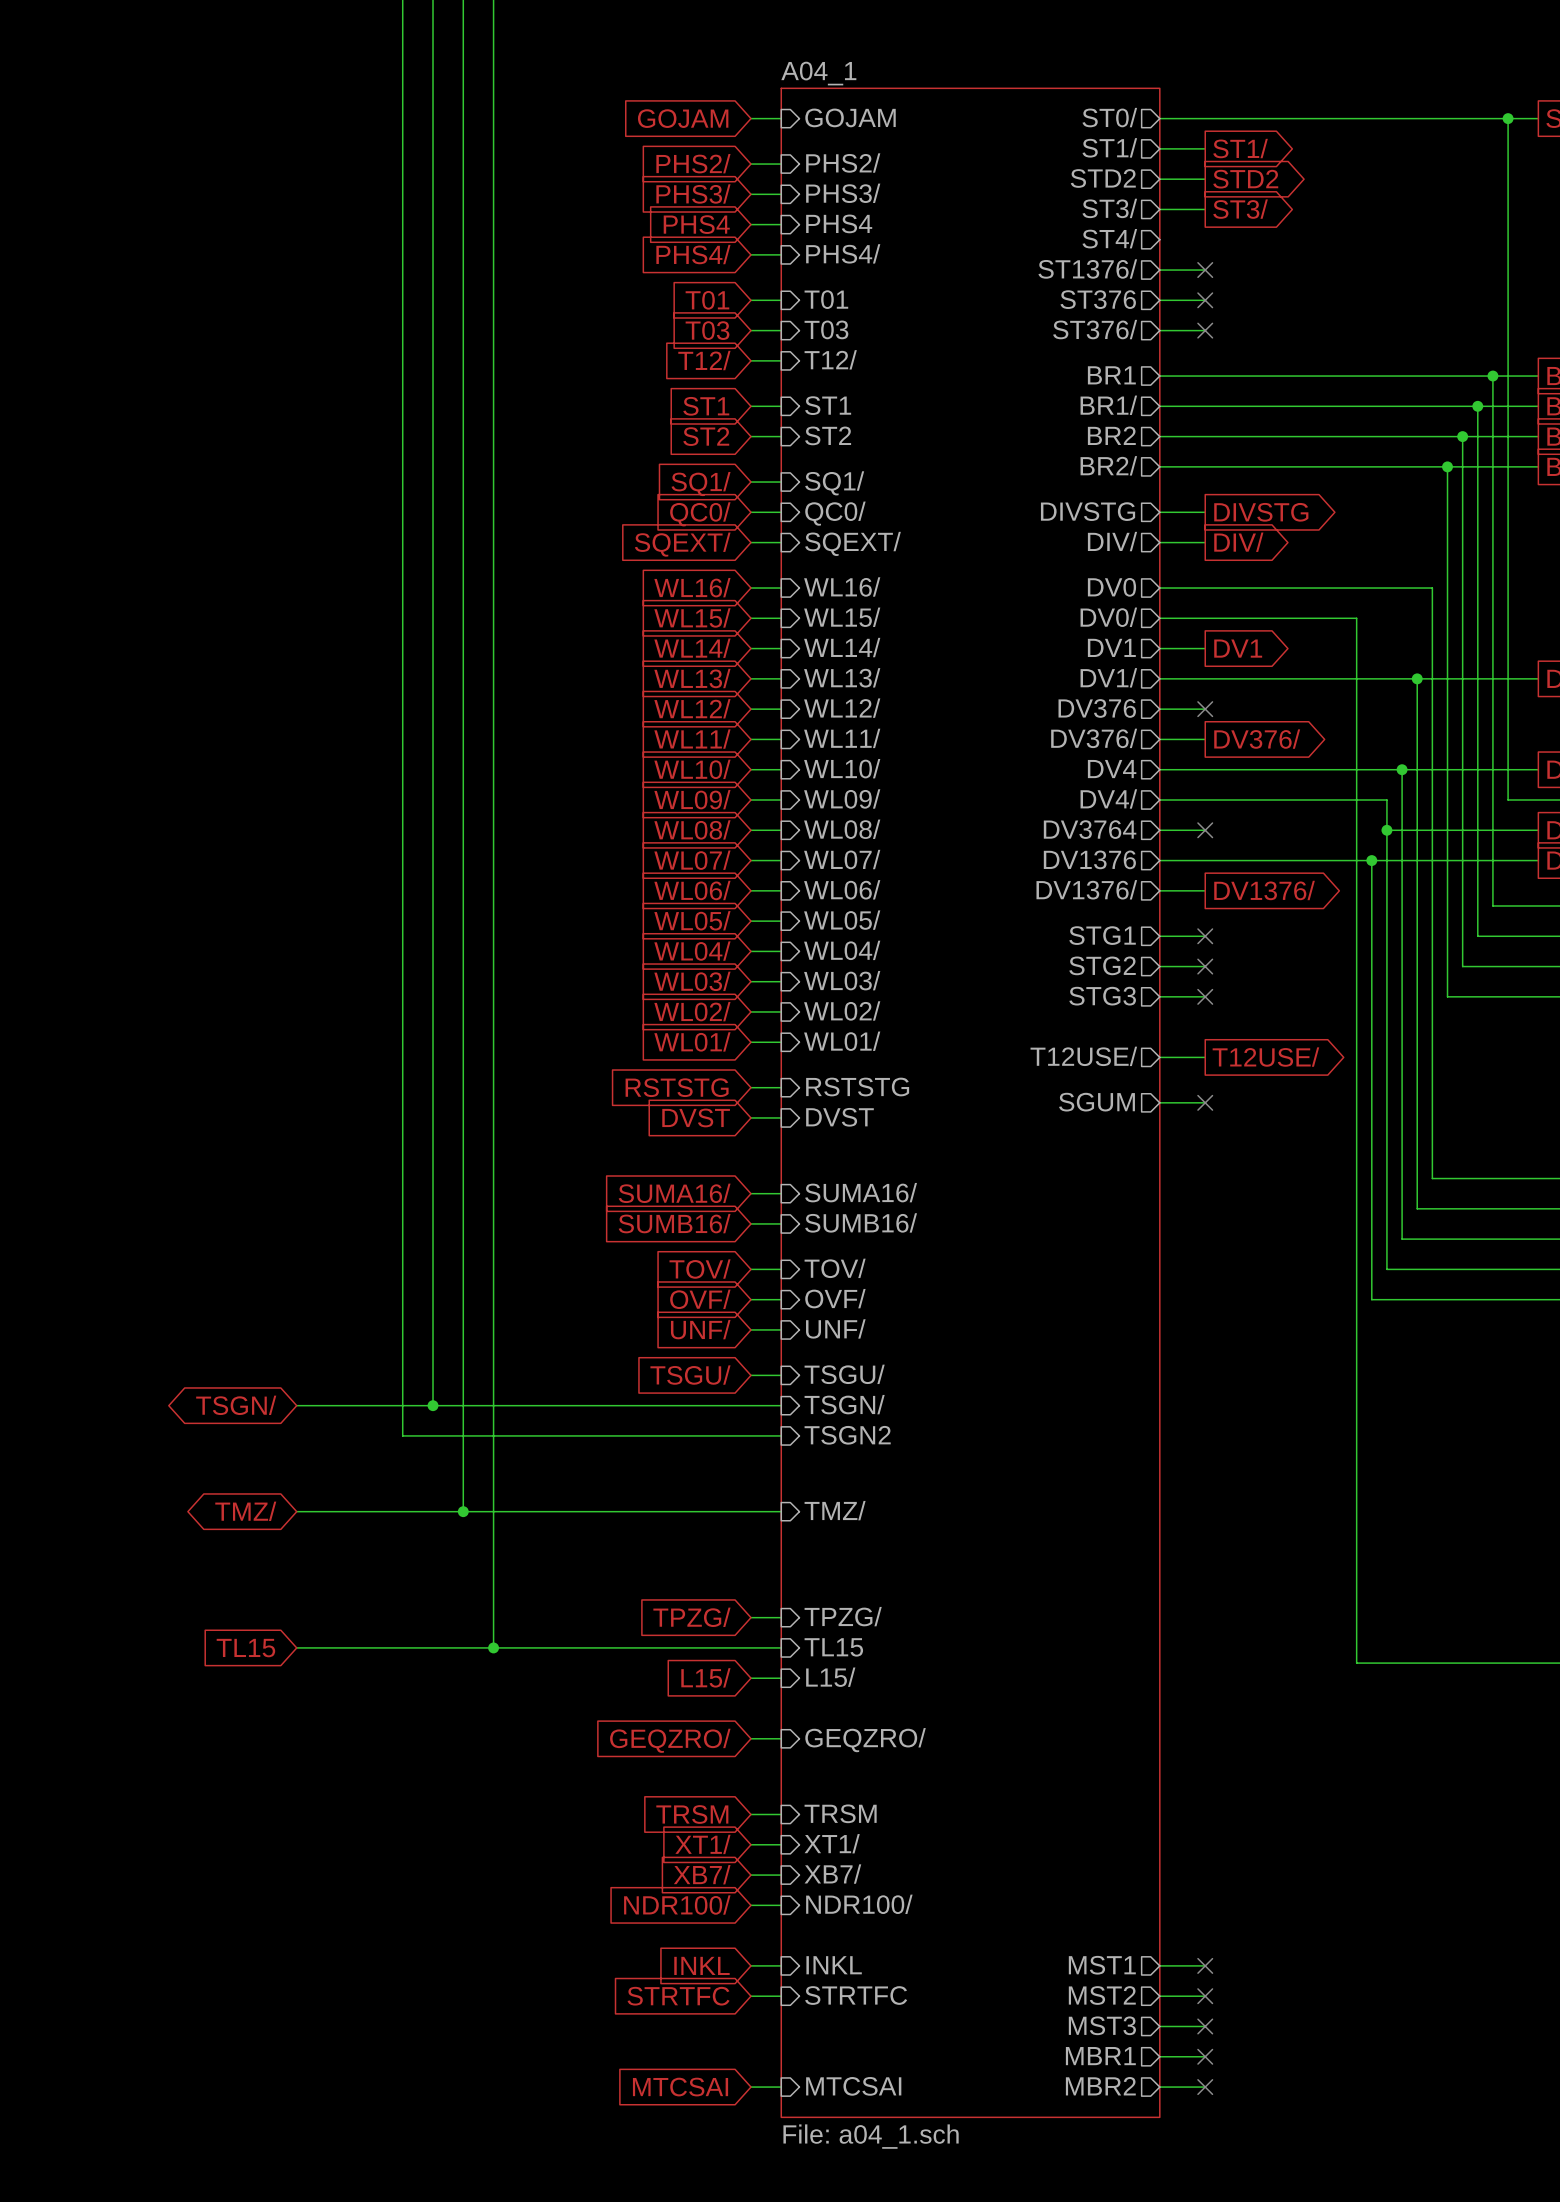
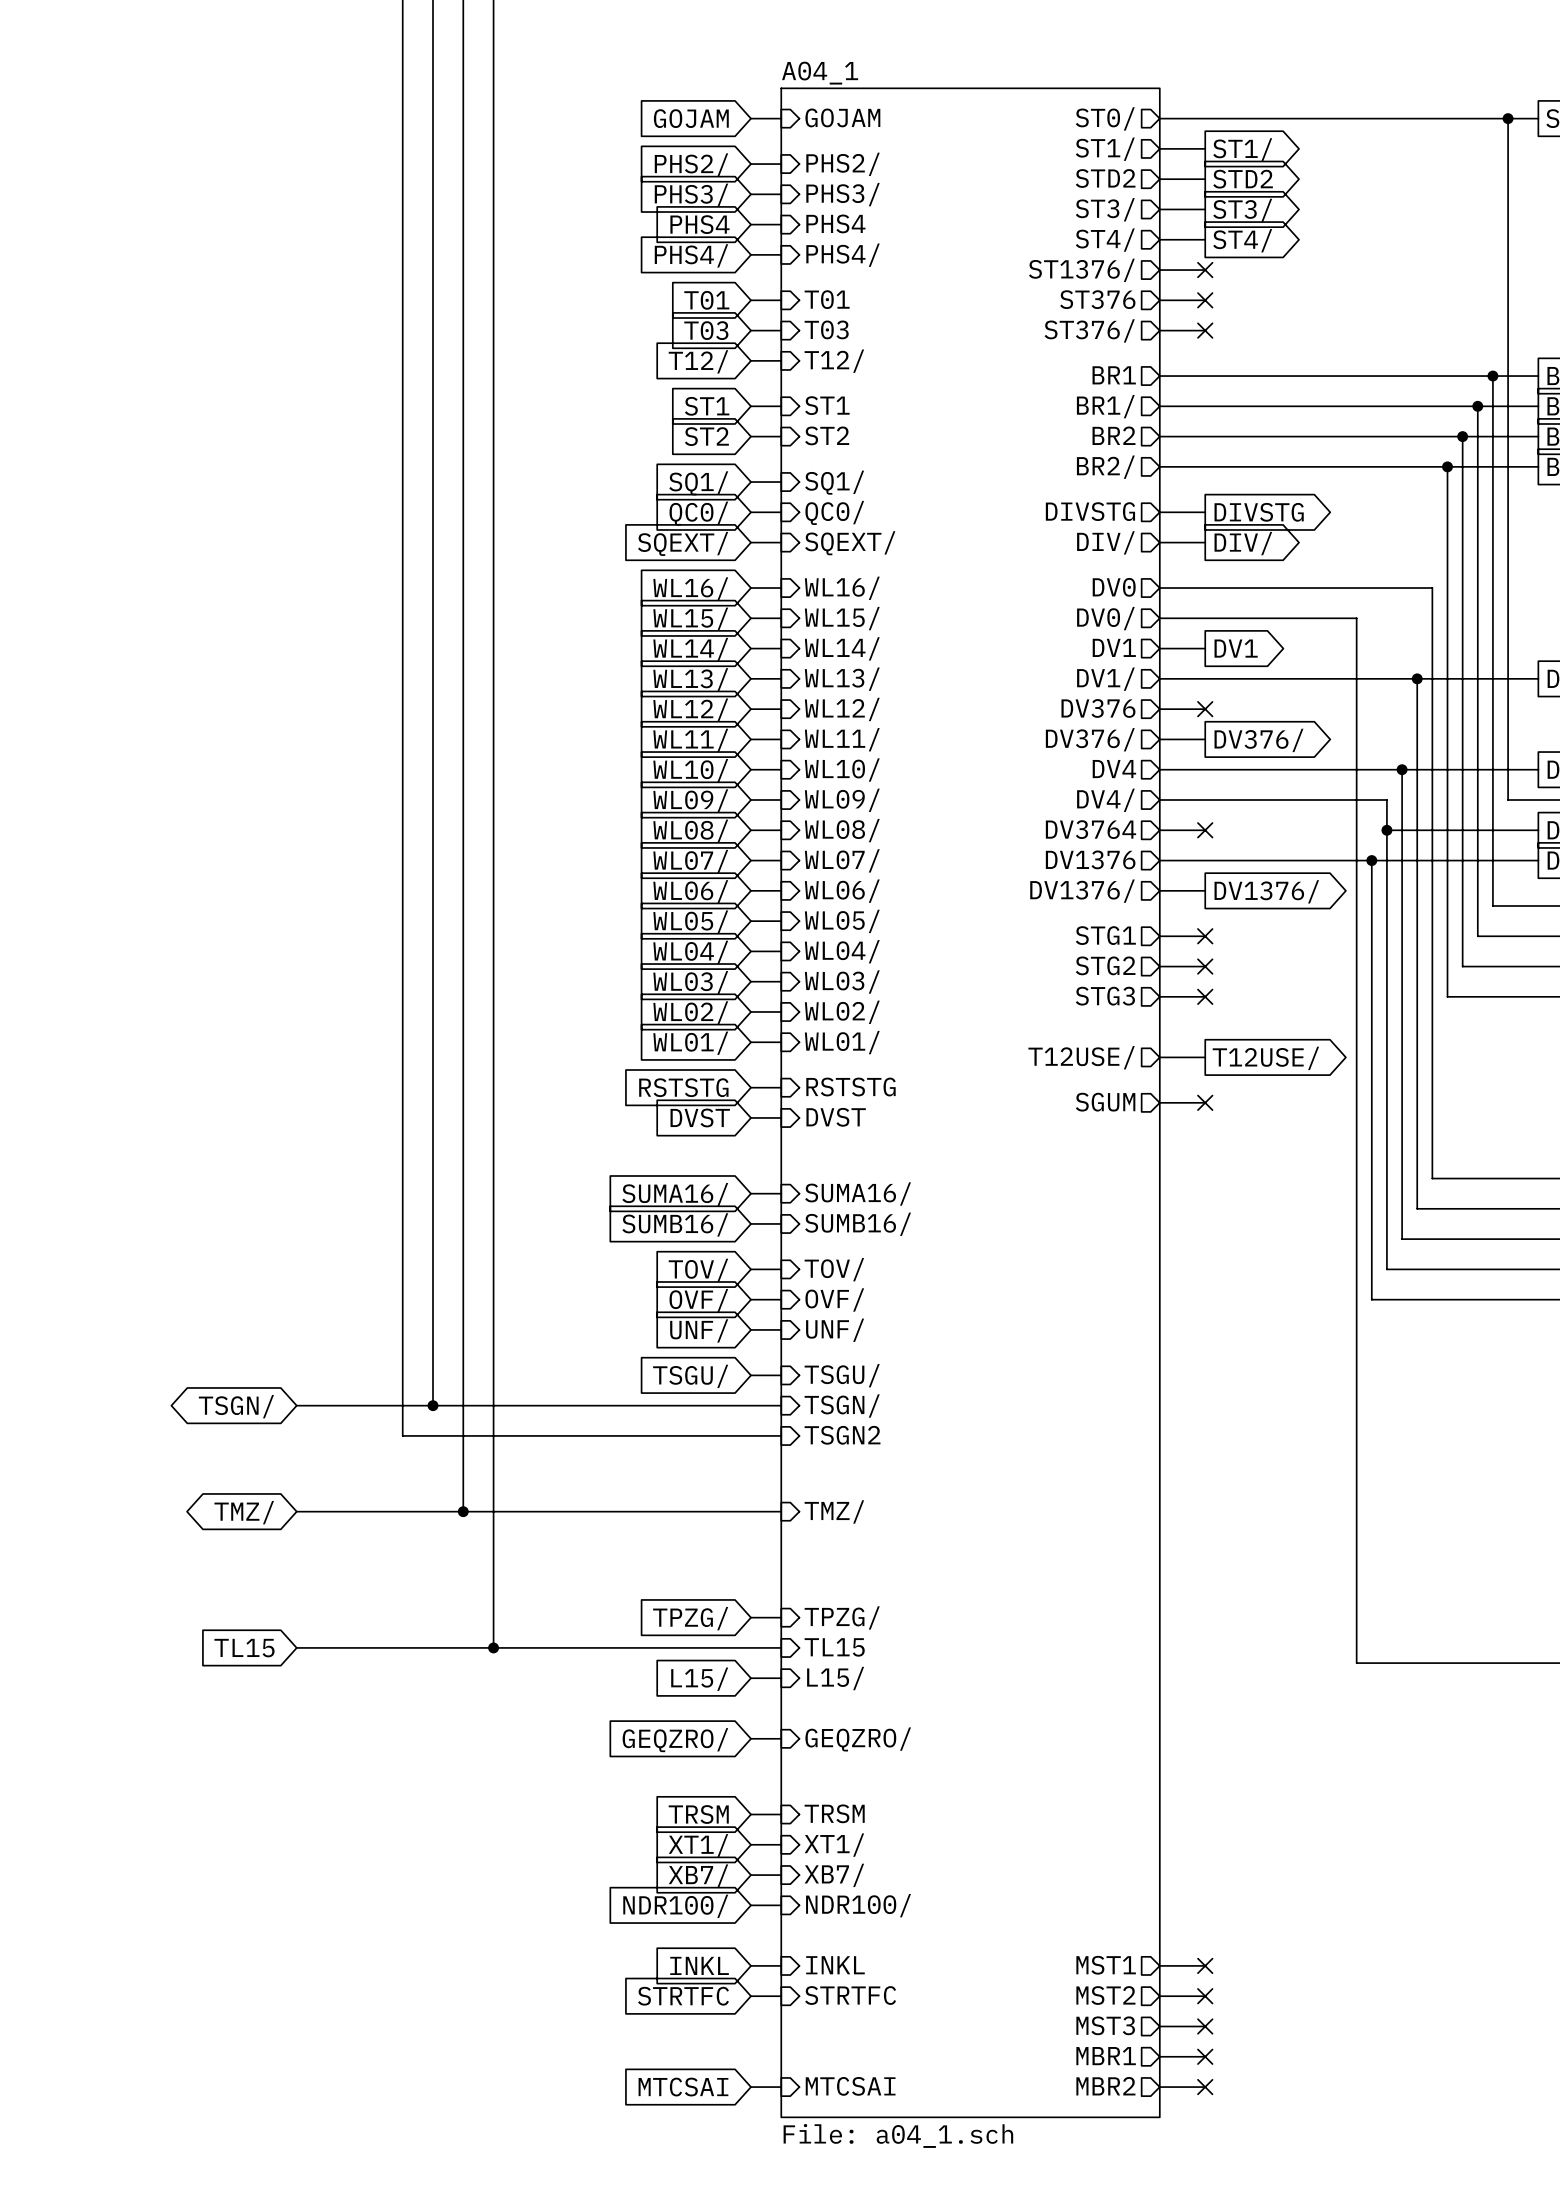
wire: none -> (1159, 239) (1205, 239)
global label: none -> ST4/ (1242, 240)

